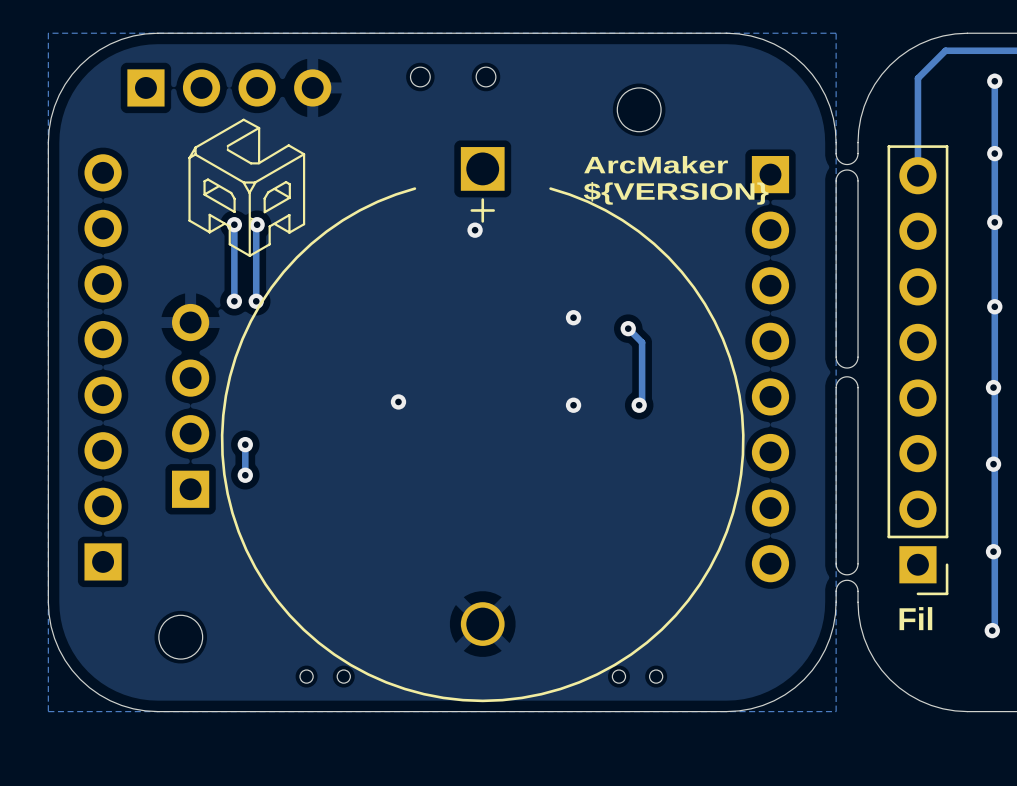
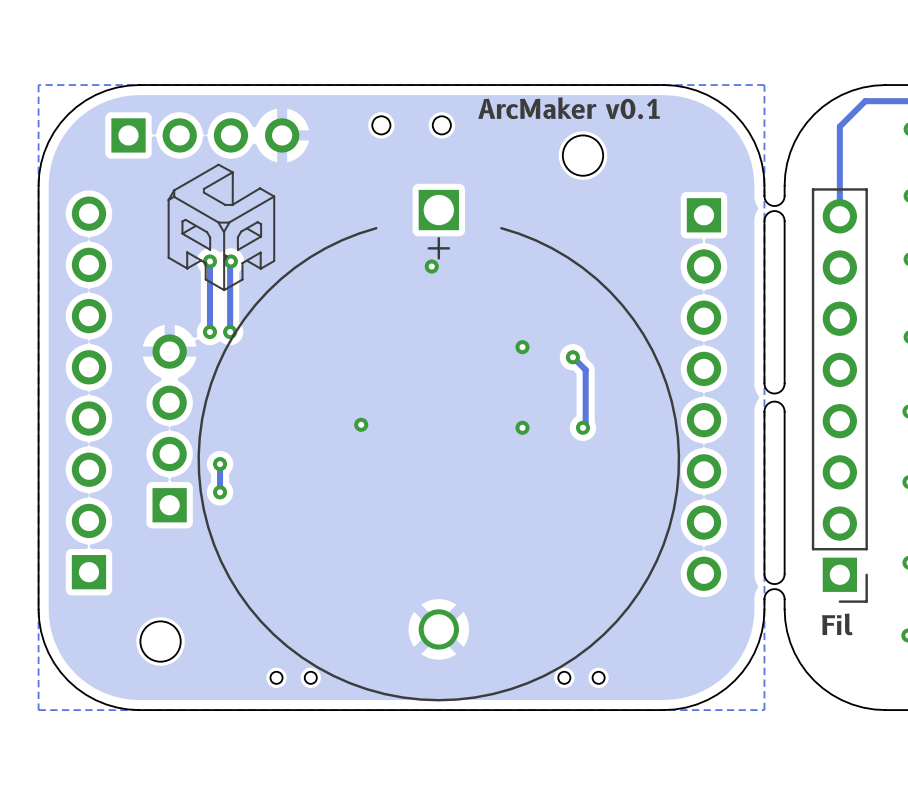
text: none -> ArcMaker v0.1 (568, 108)
text: ArcMaker (656, 164) -> none
text: ${VERSION} (676, 193) -> none

